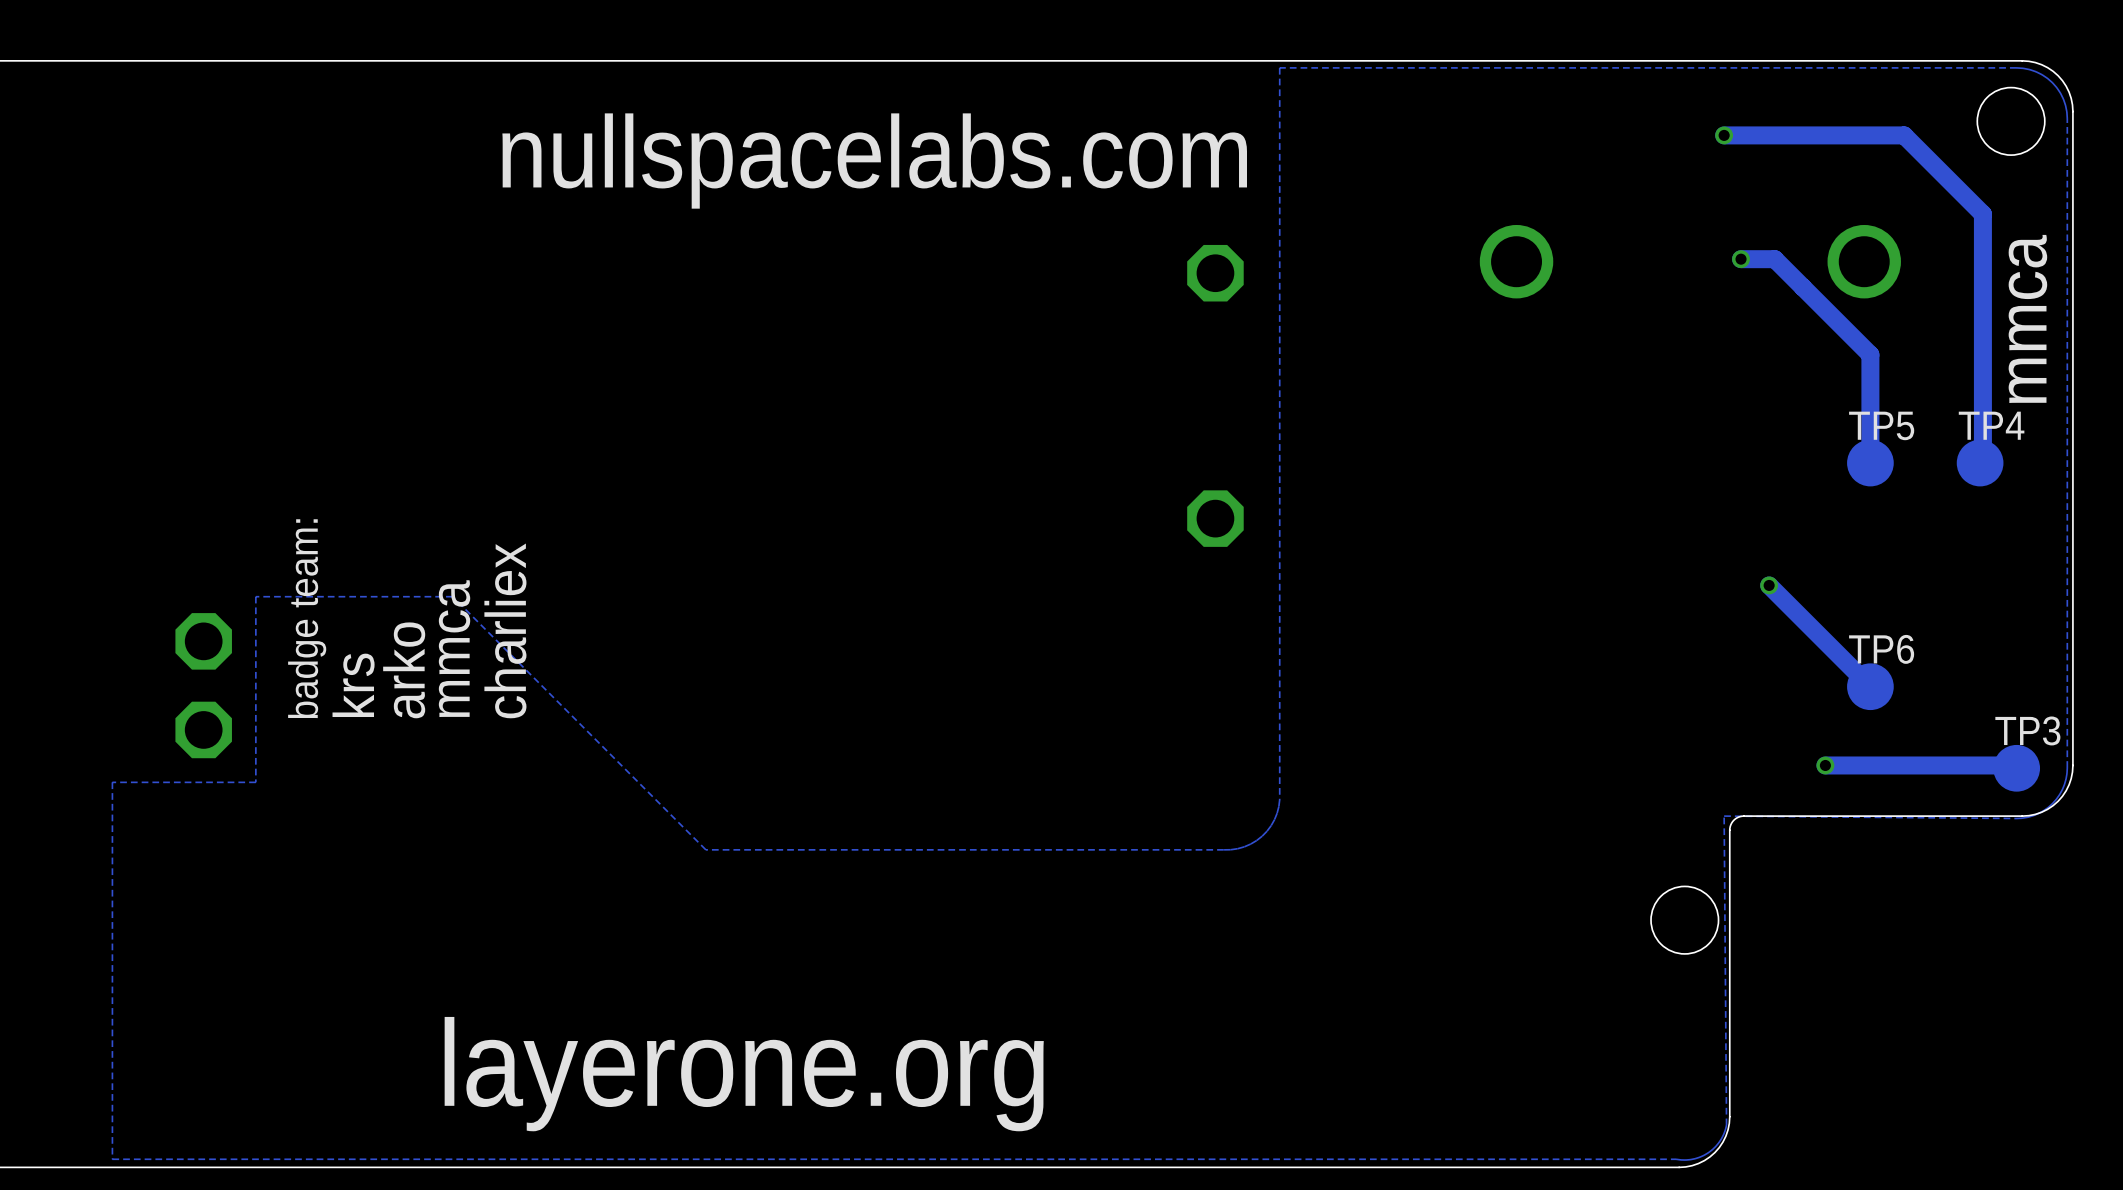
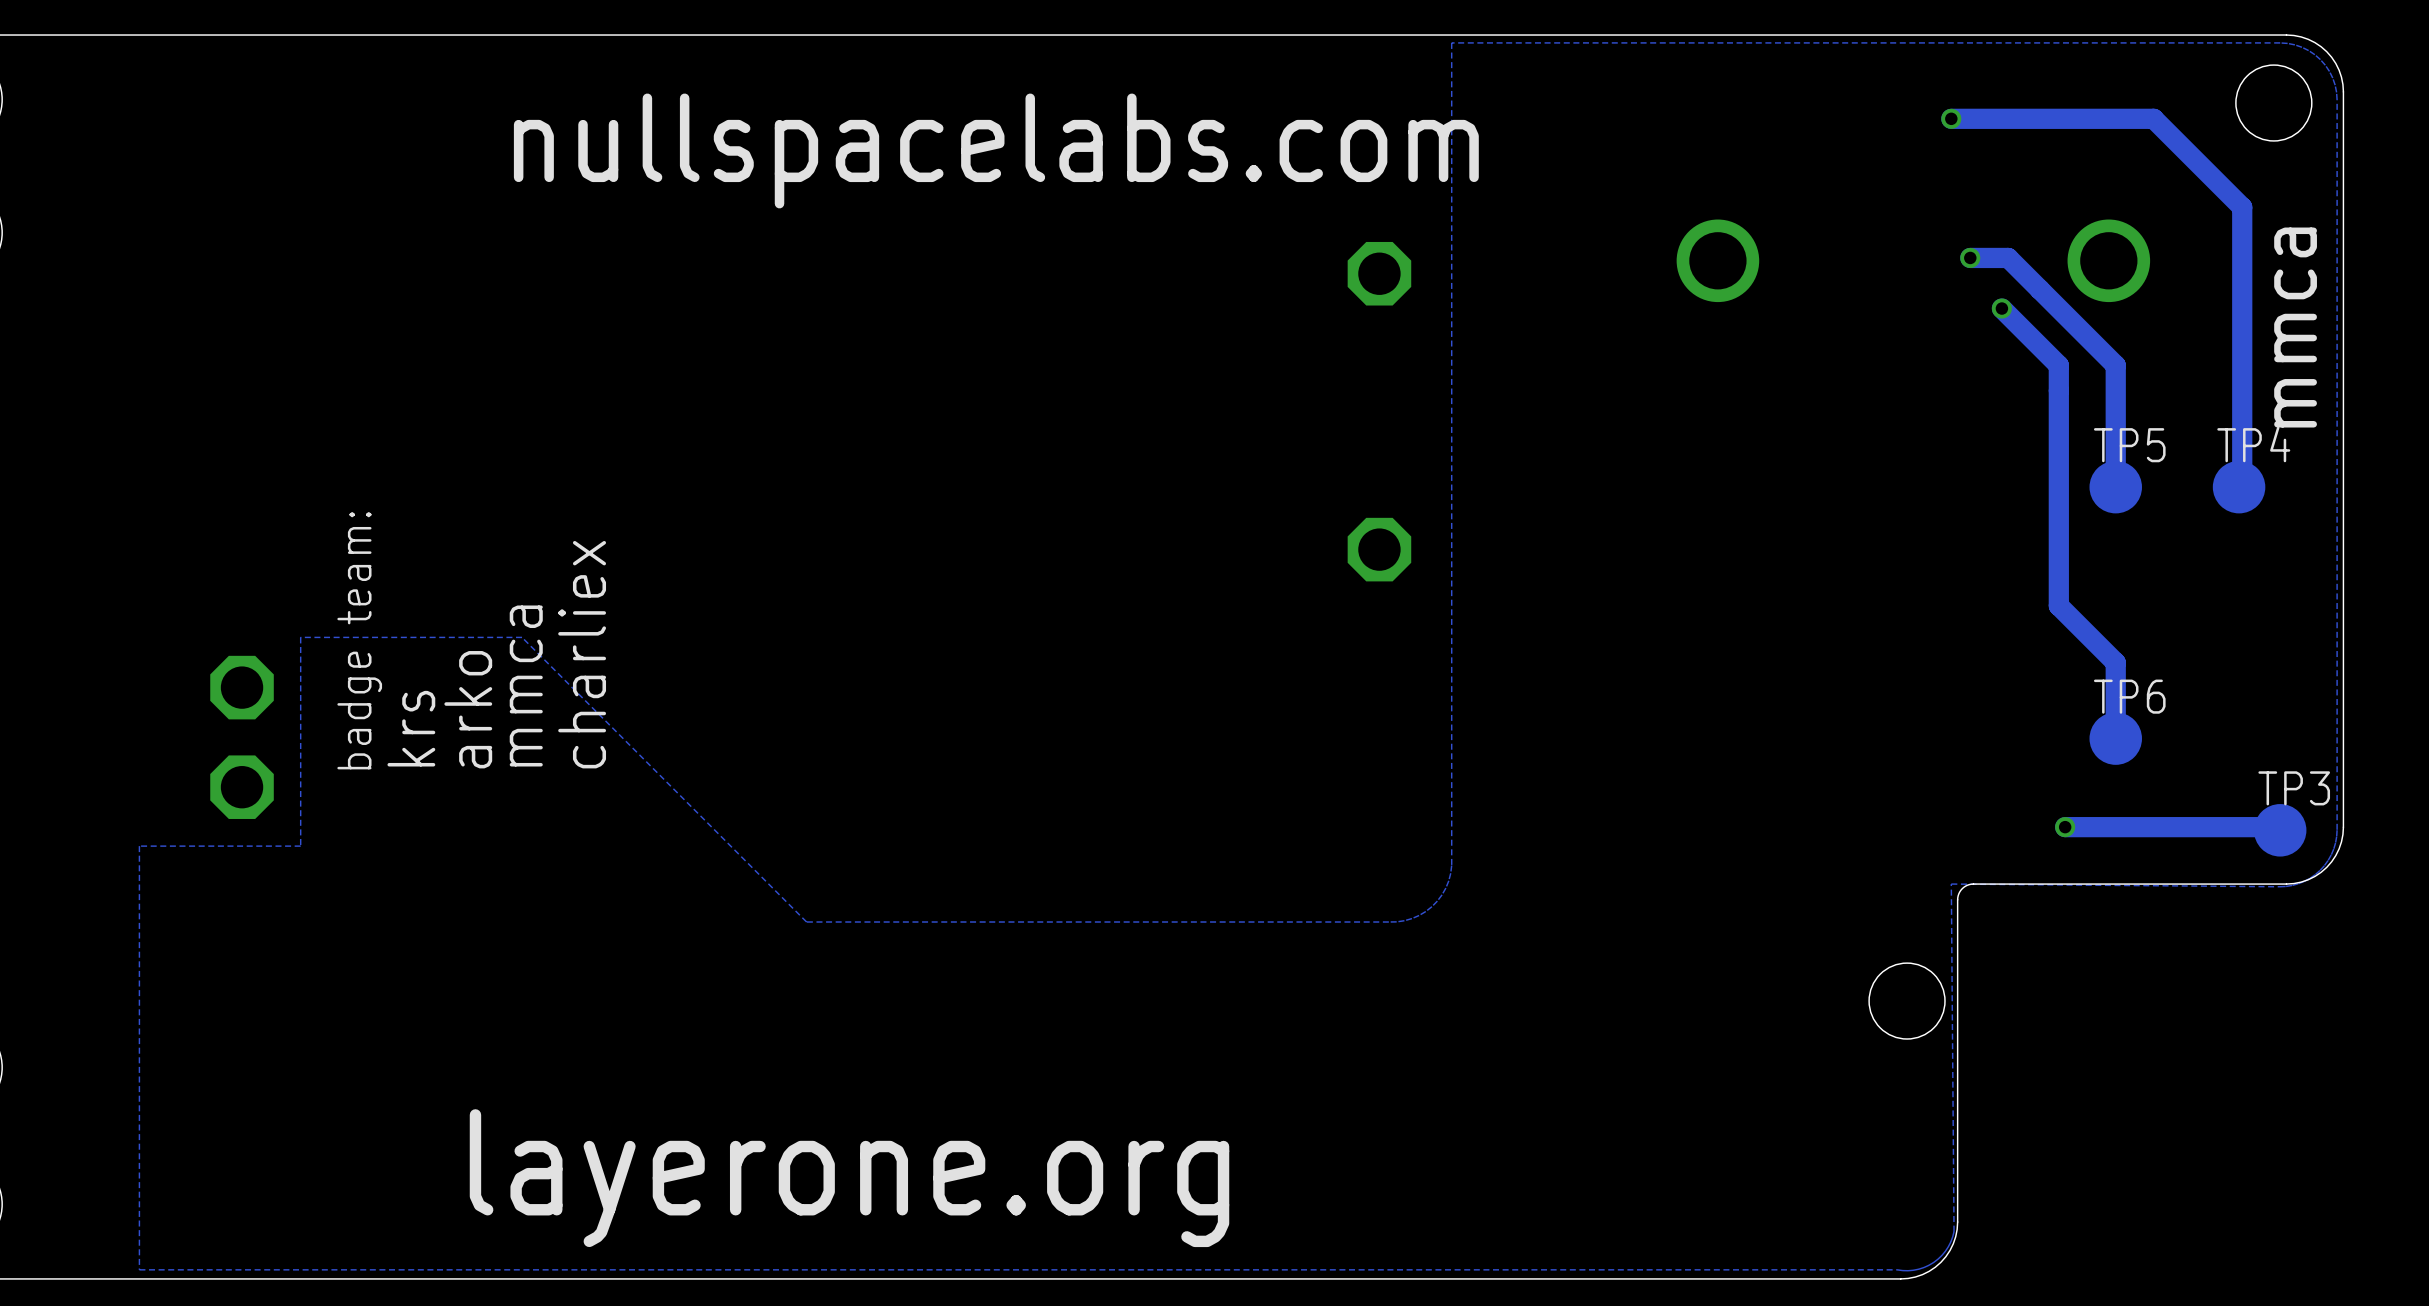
via: none -> (2001, 308)
track: (1769, 585) (1870, 686) -> (2001, 308) (2058, 365) (2058, 605) (2115, 662) (2115, 738)
via: (1769, 585) -> none

